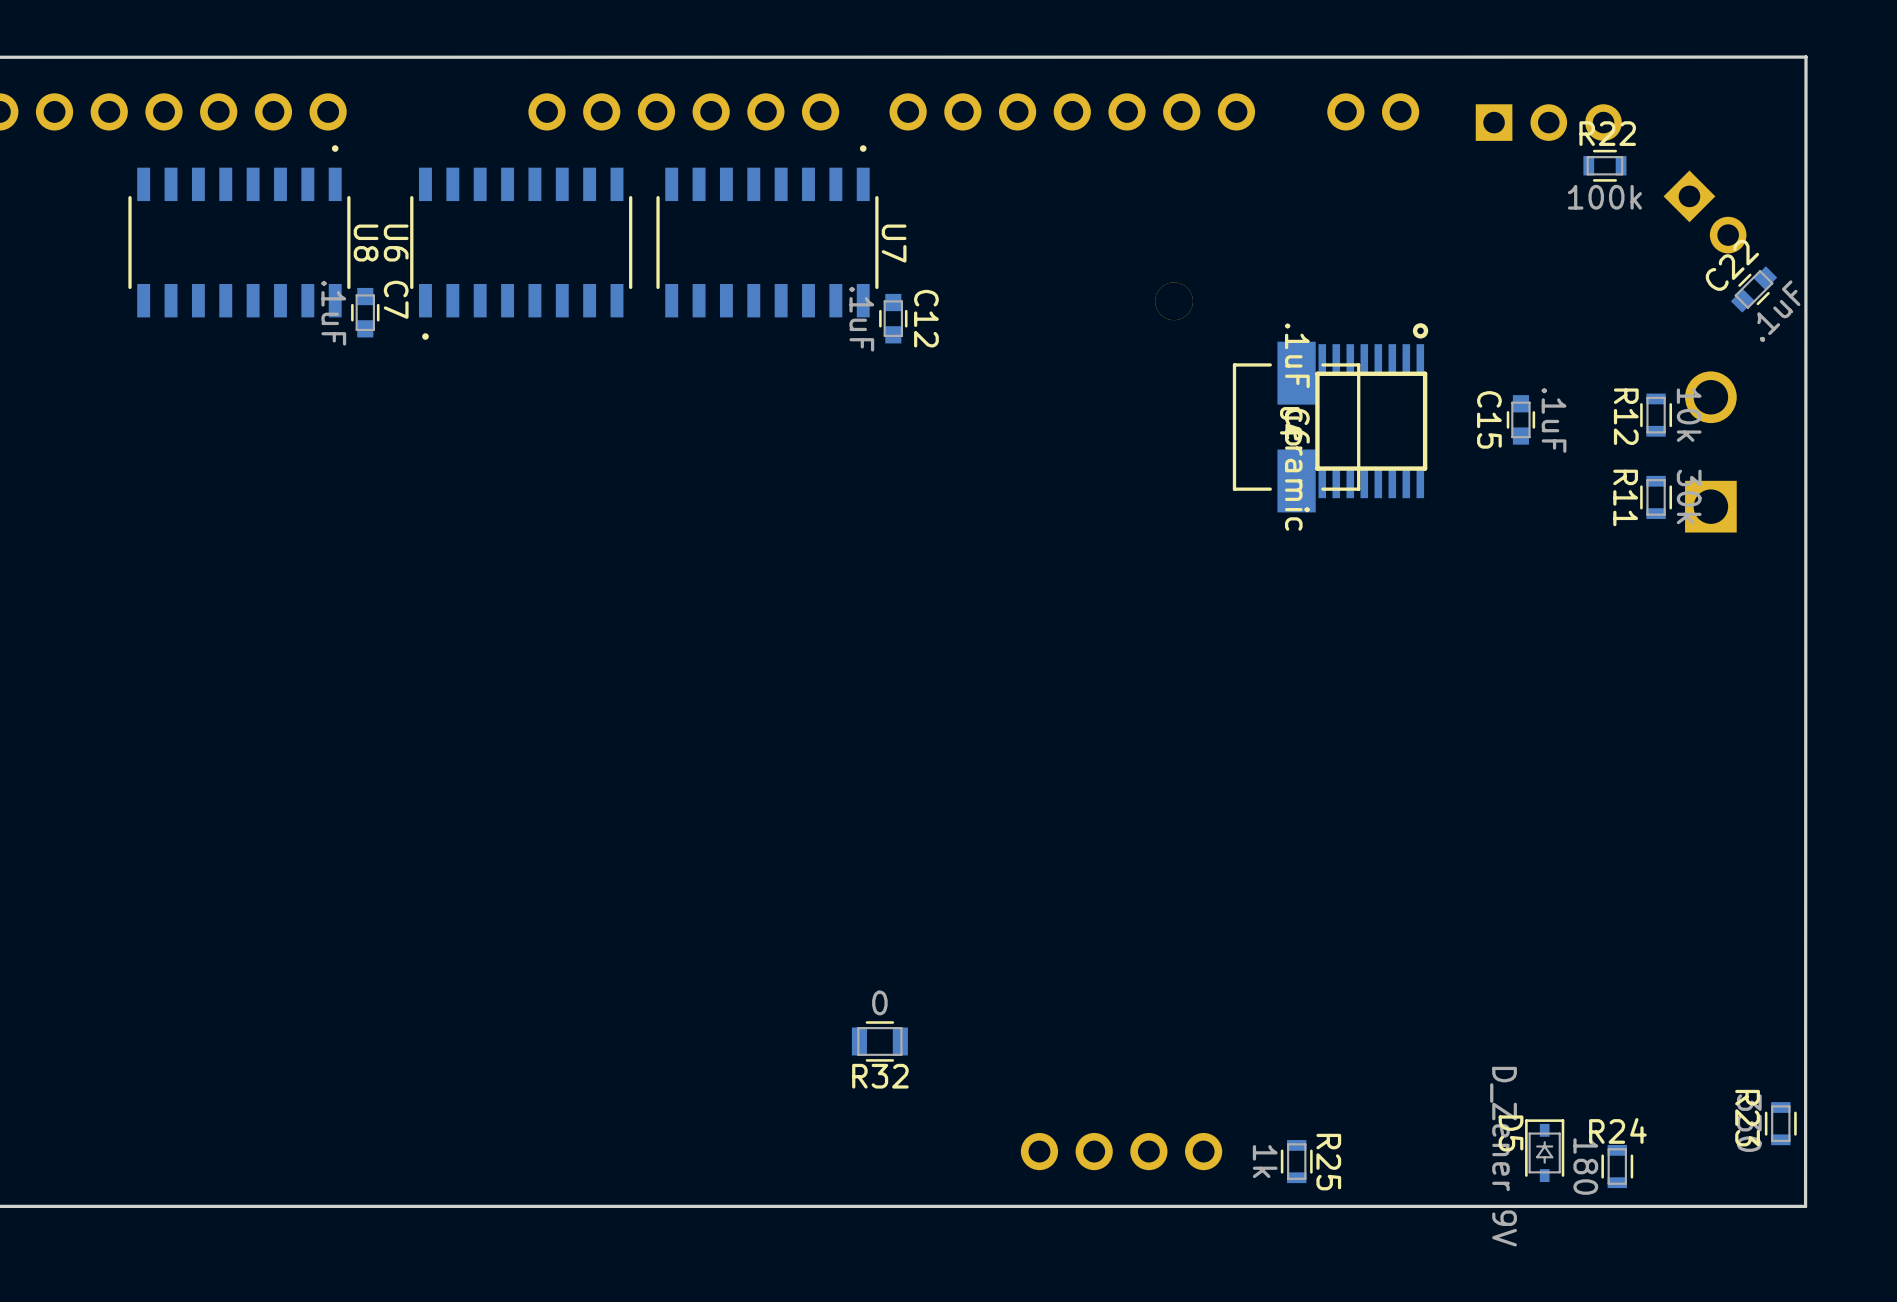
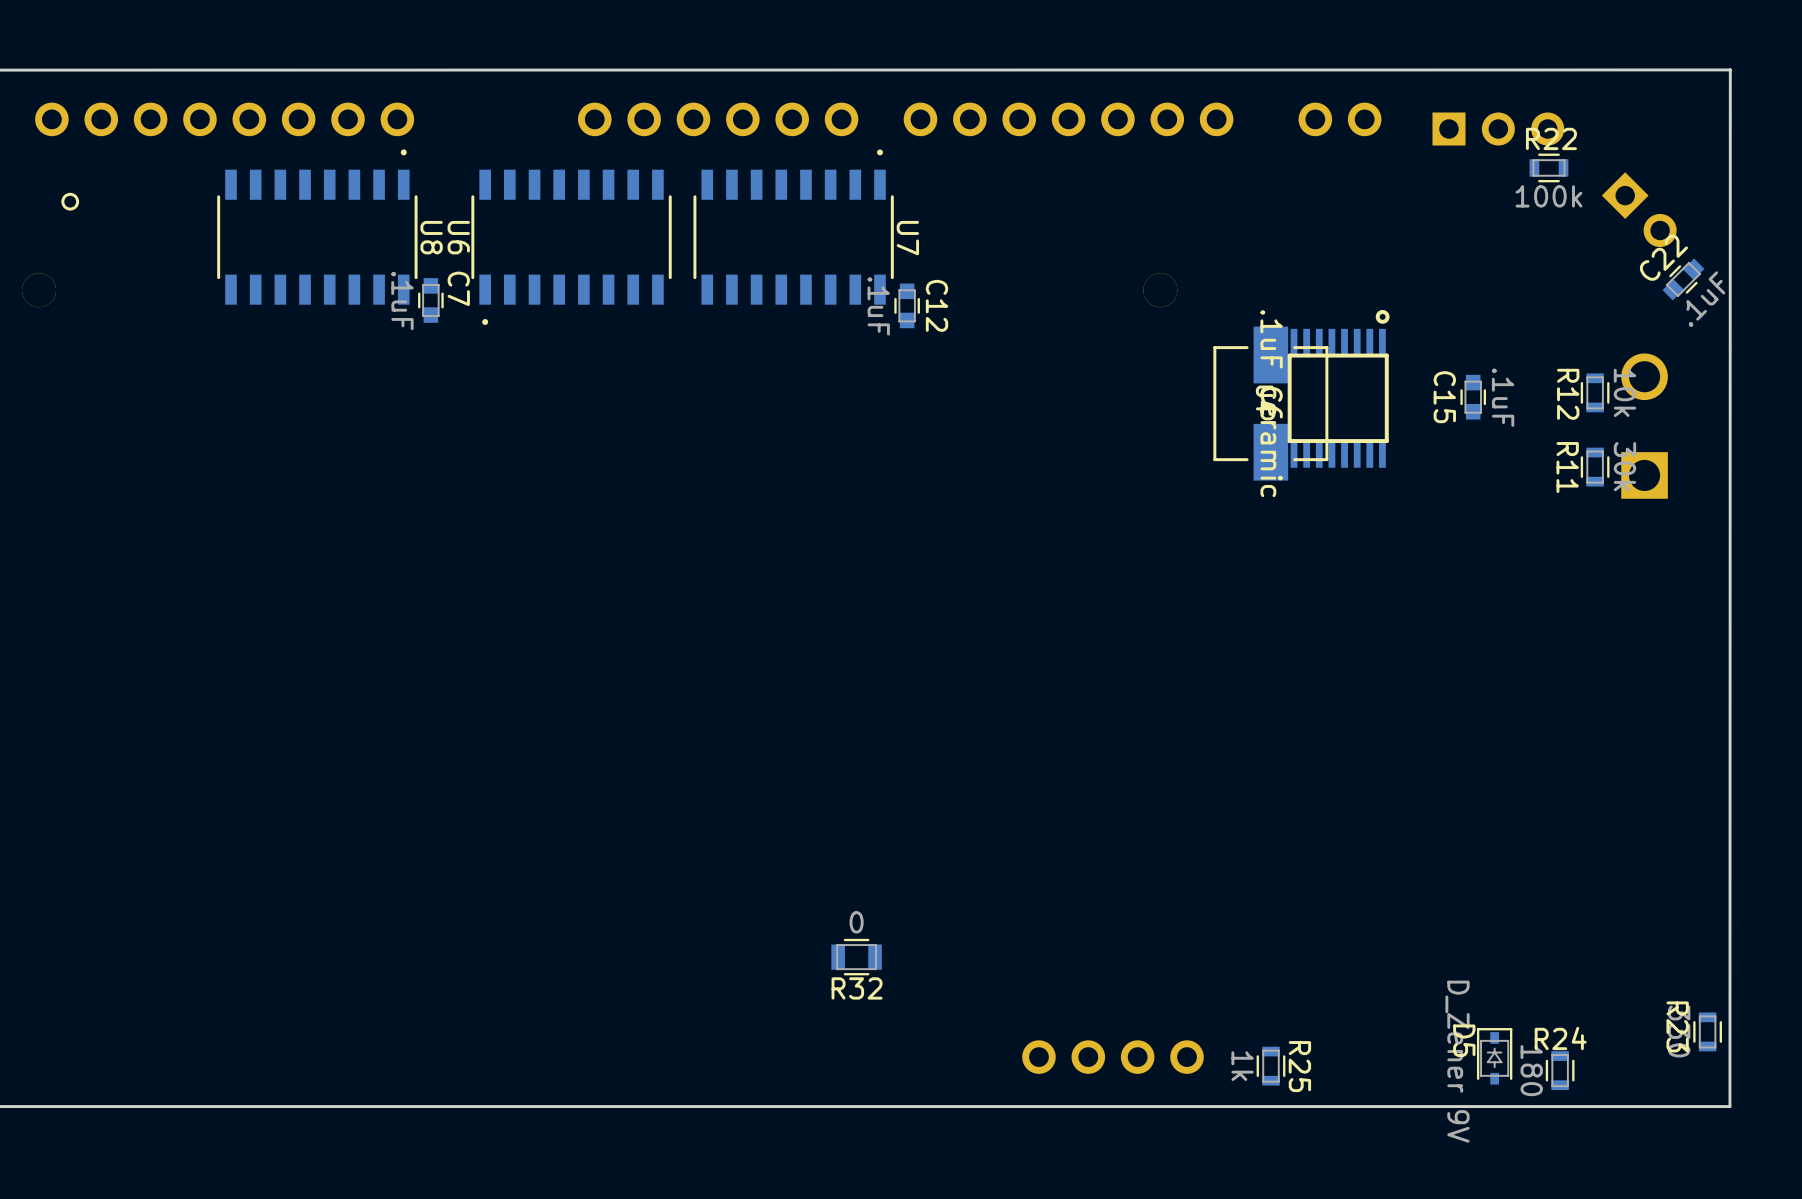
R32 position: (879, 1041) -> (856, 957)

